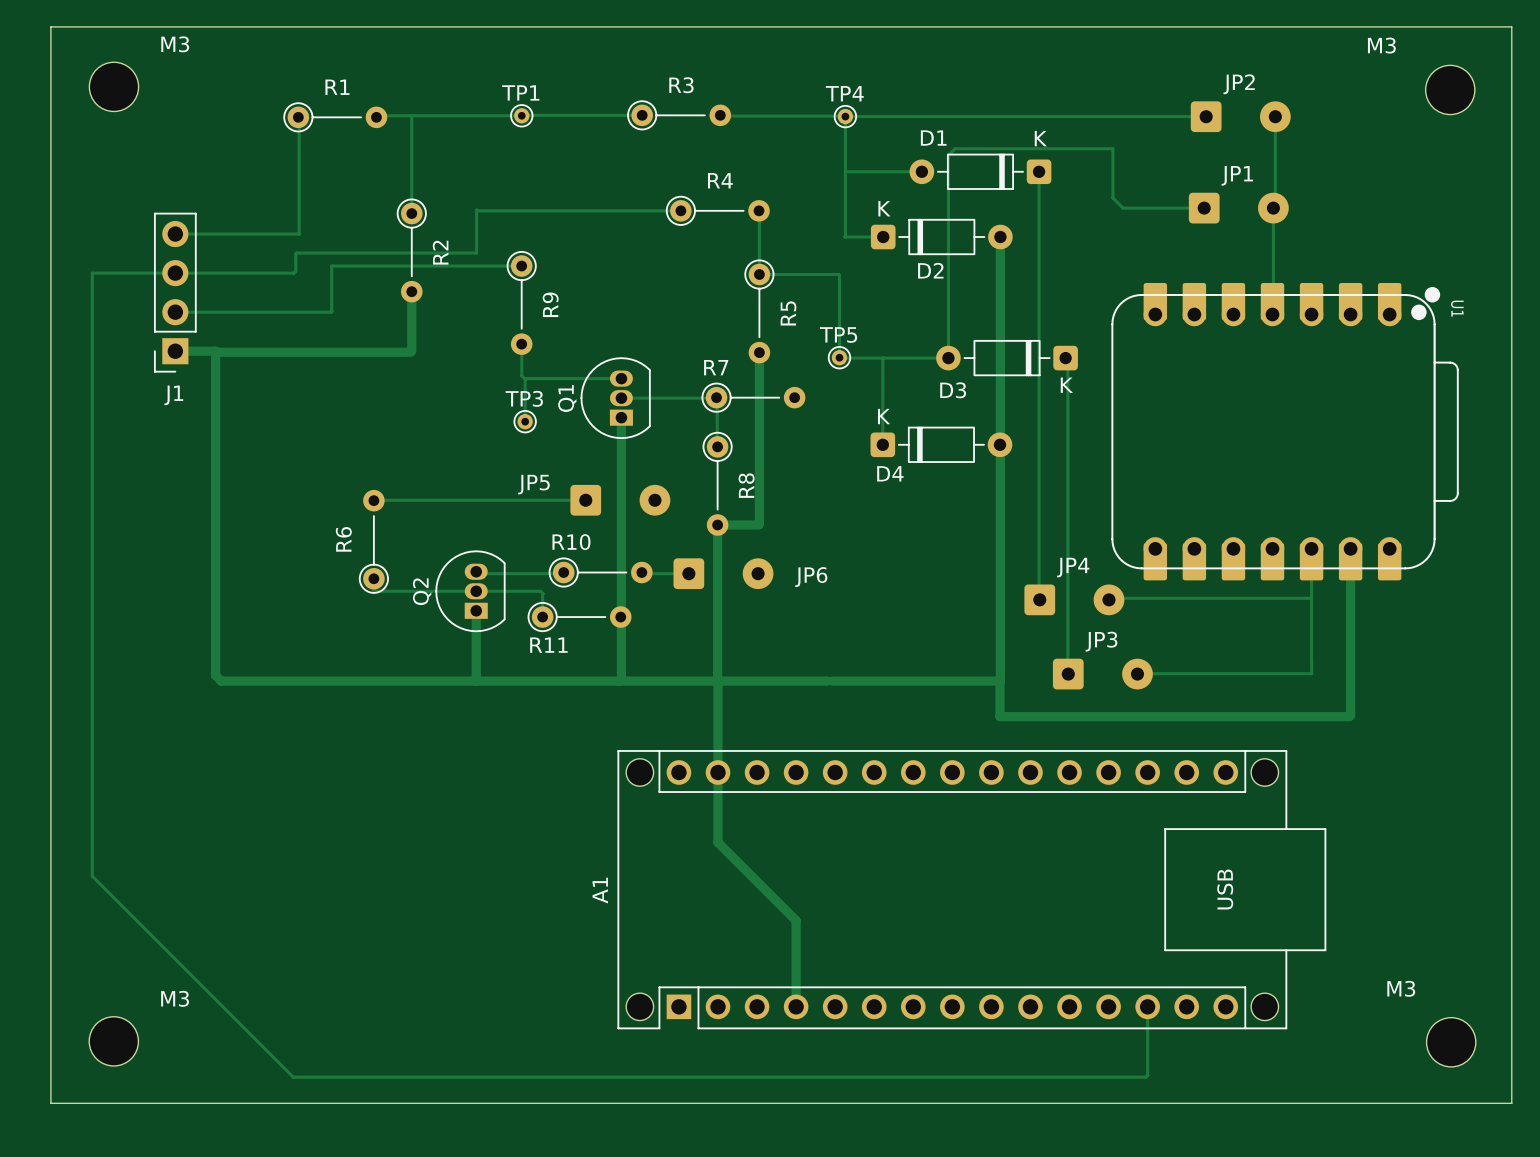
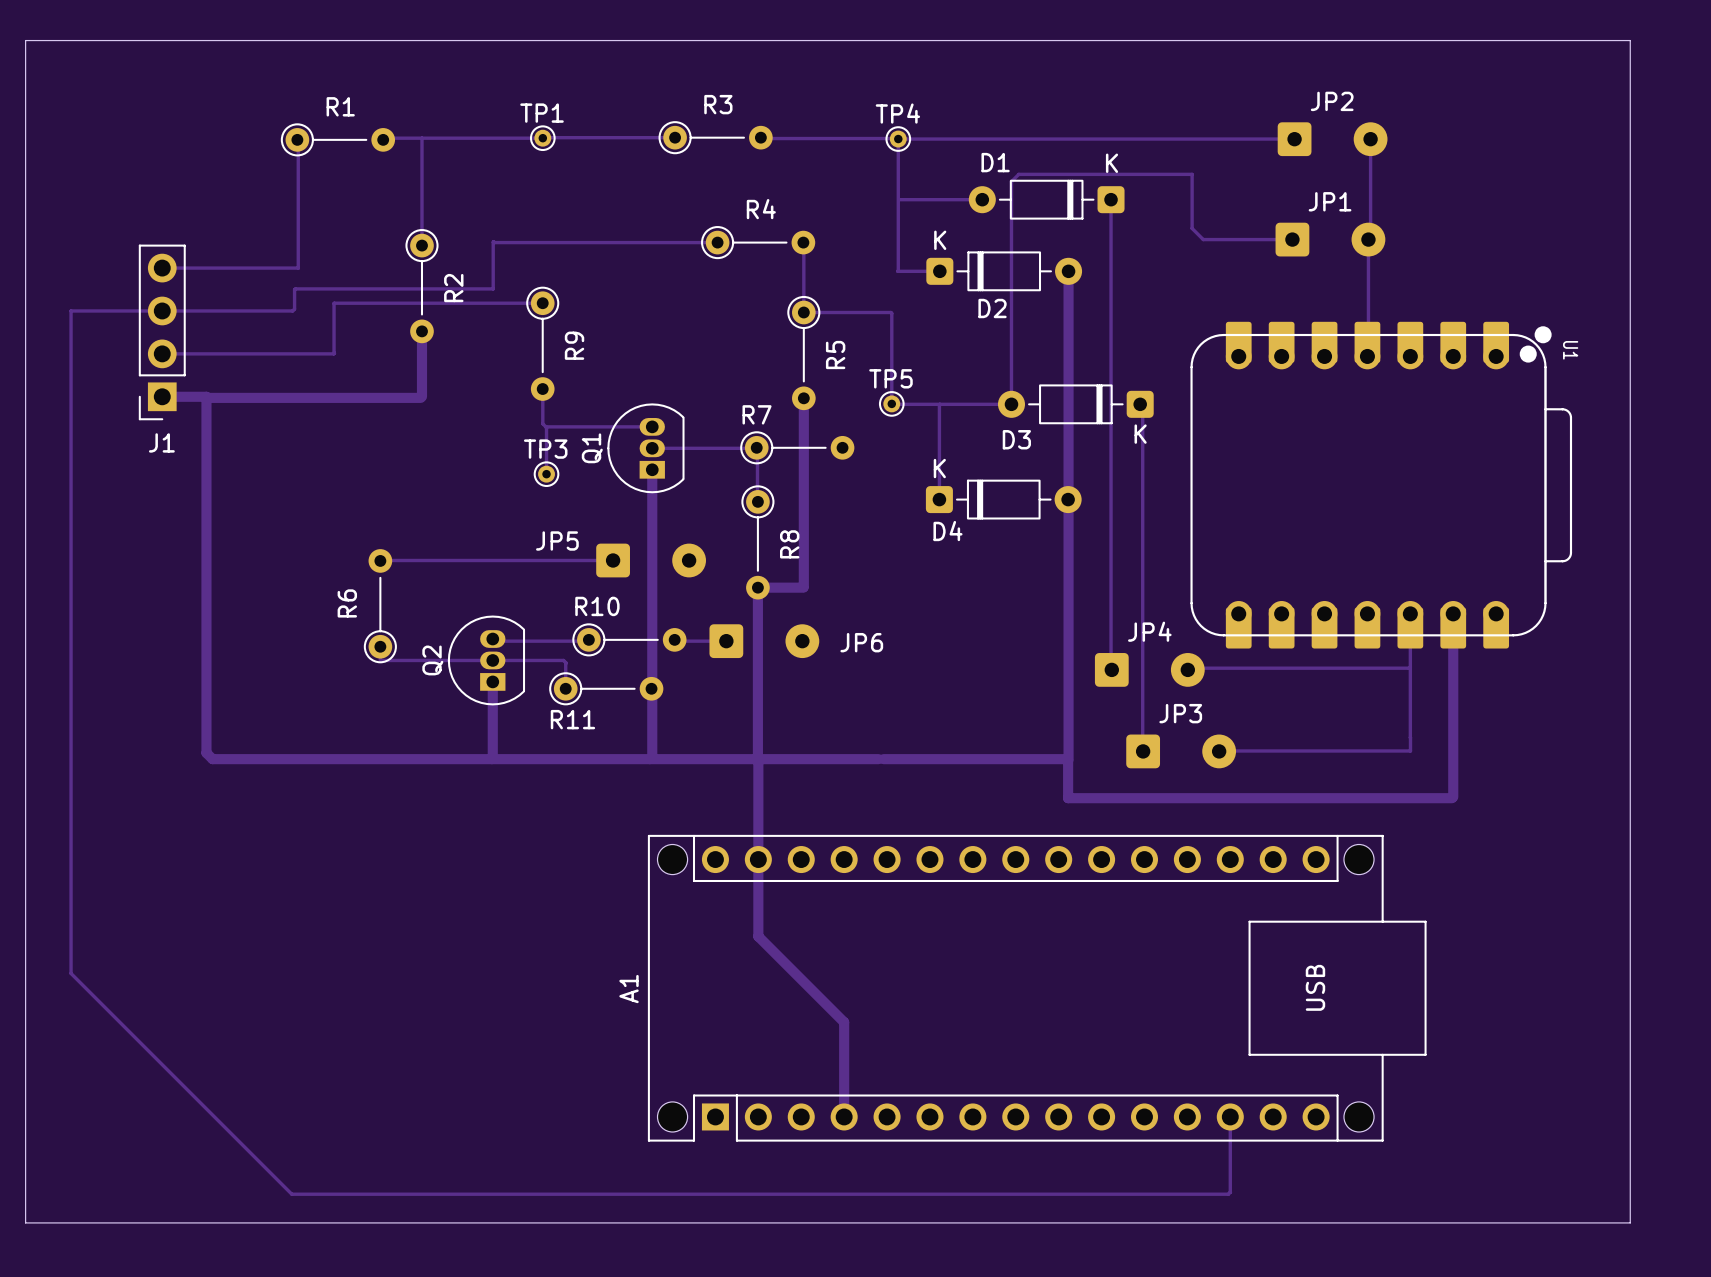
M3: (113, 86) -> none
M3: (1450, 89) -> none
M3: (113, 1041) -> none
M3: (1451, 1042) -> none

